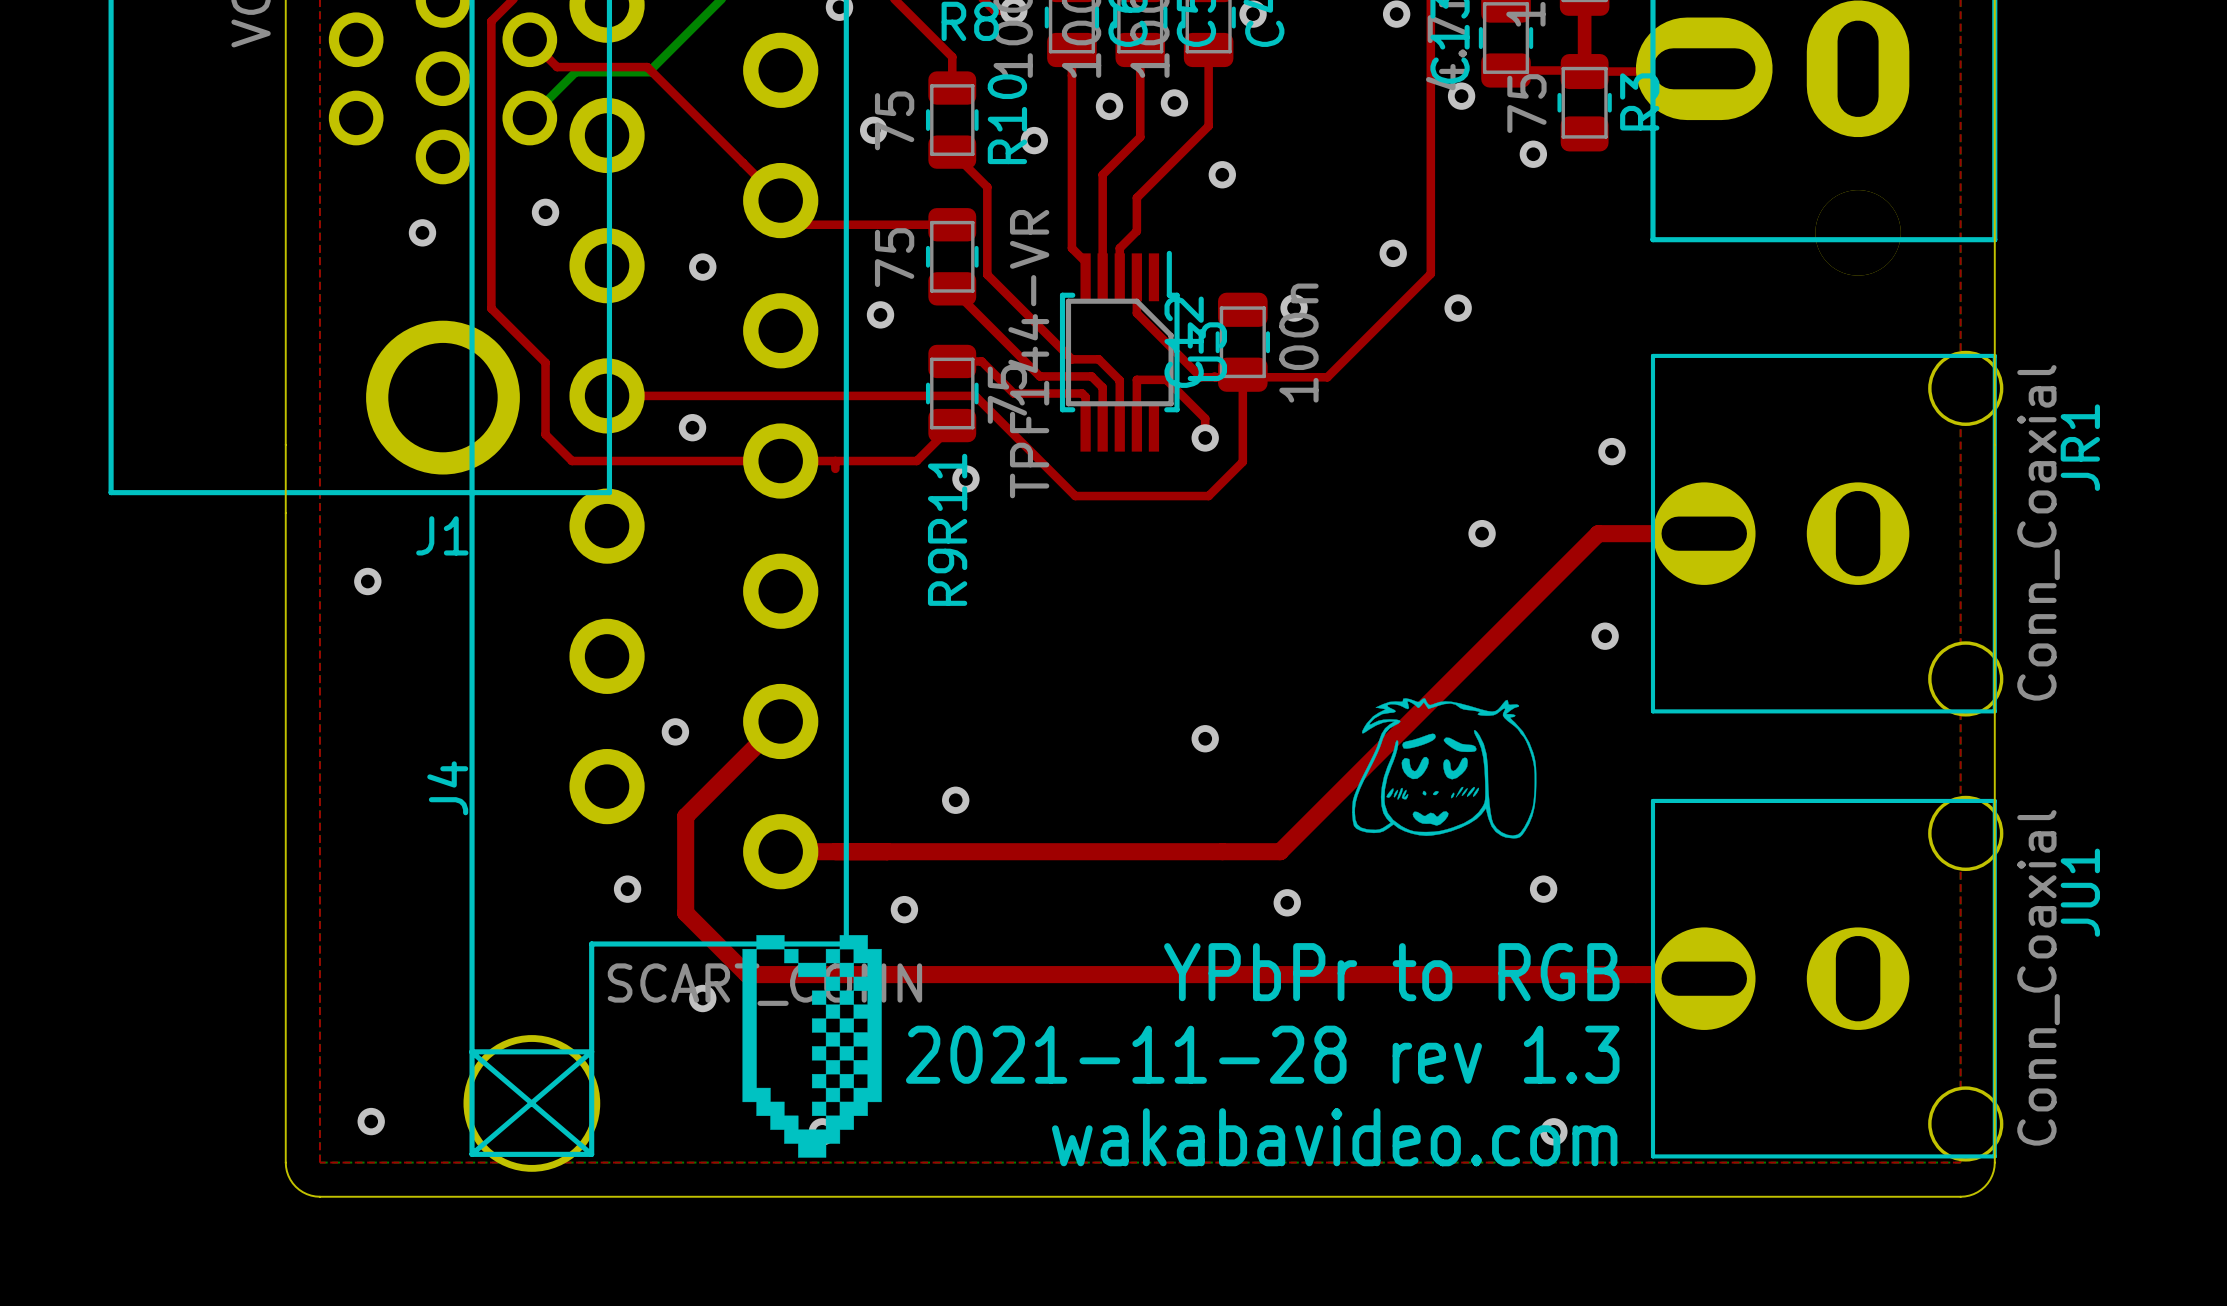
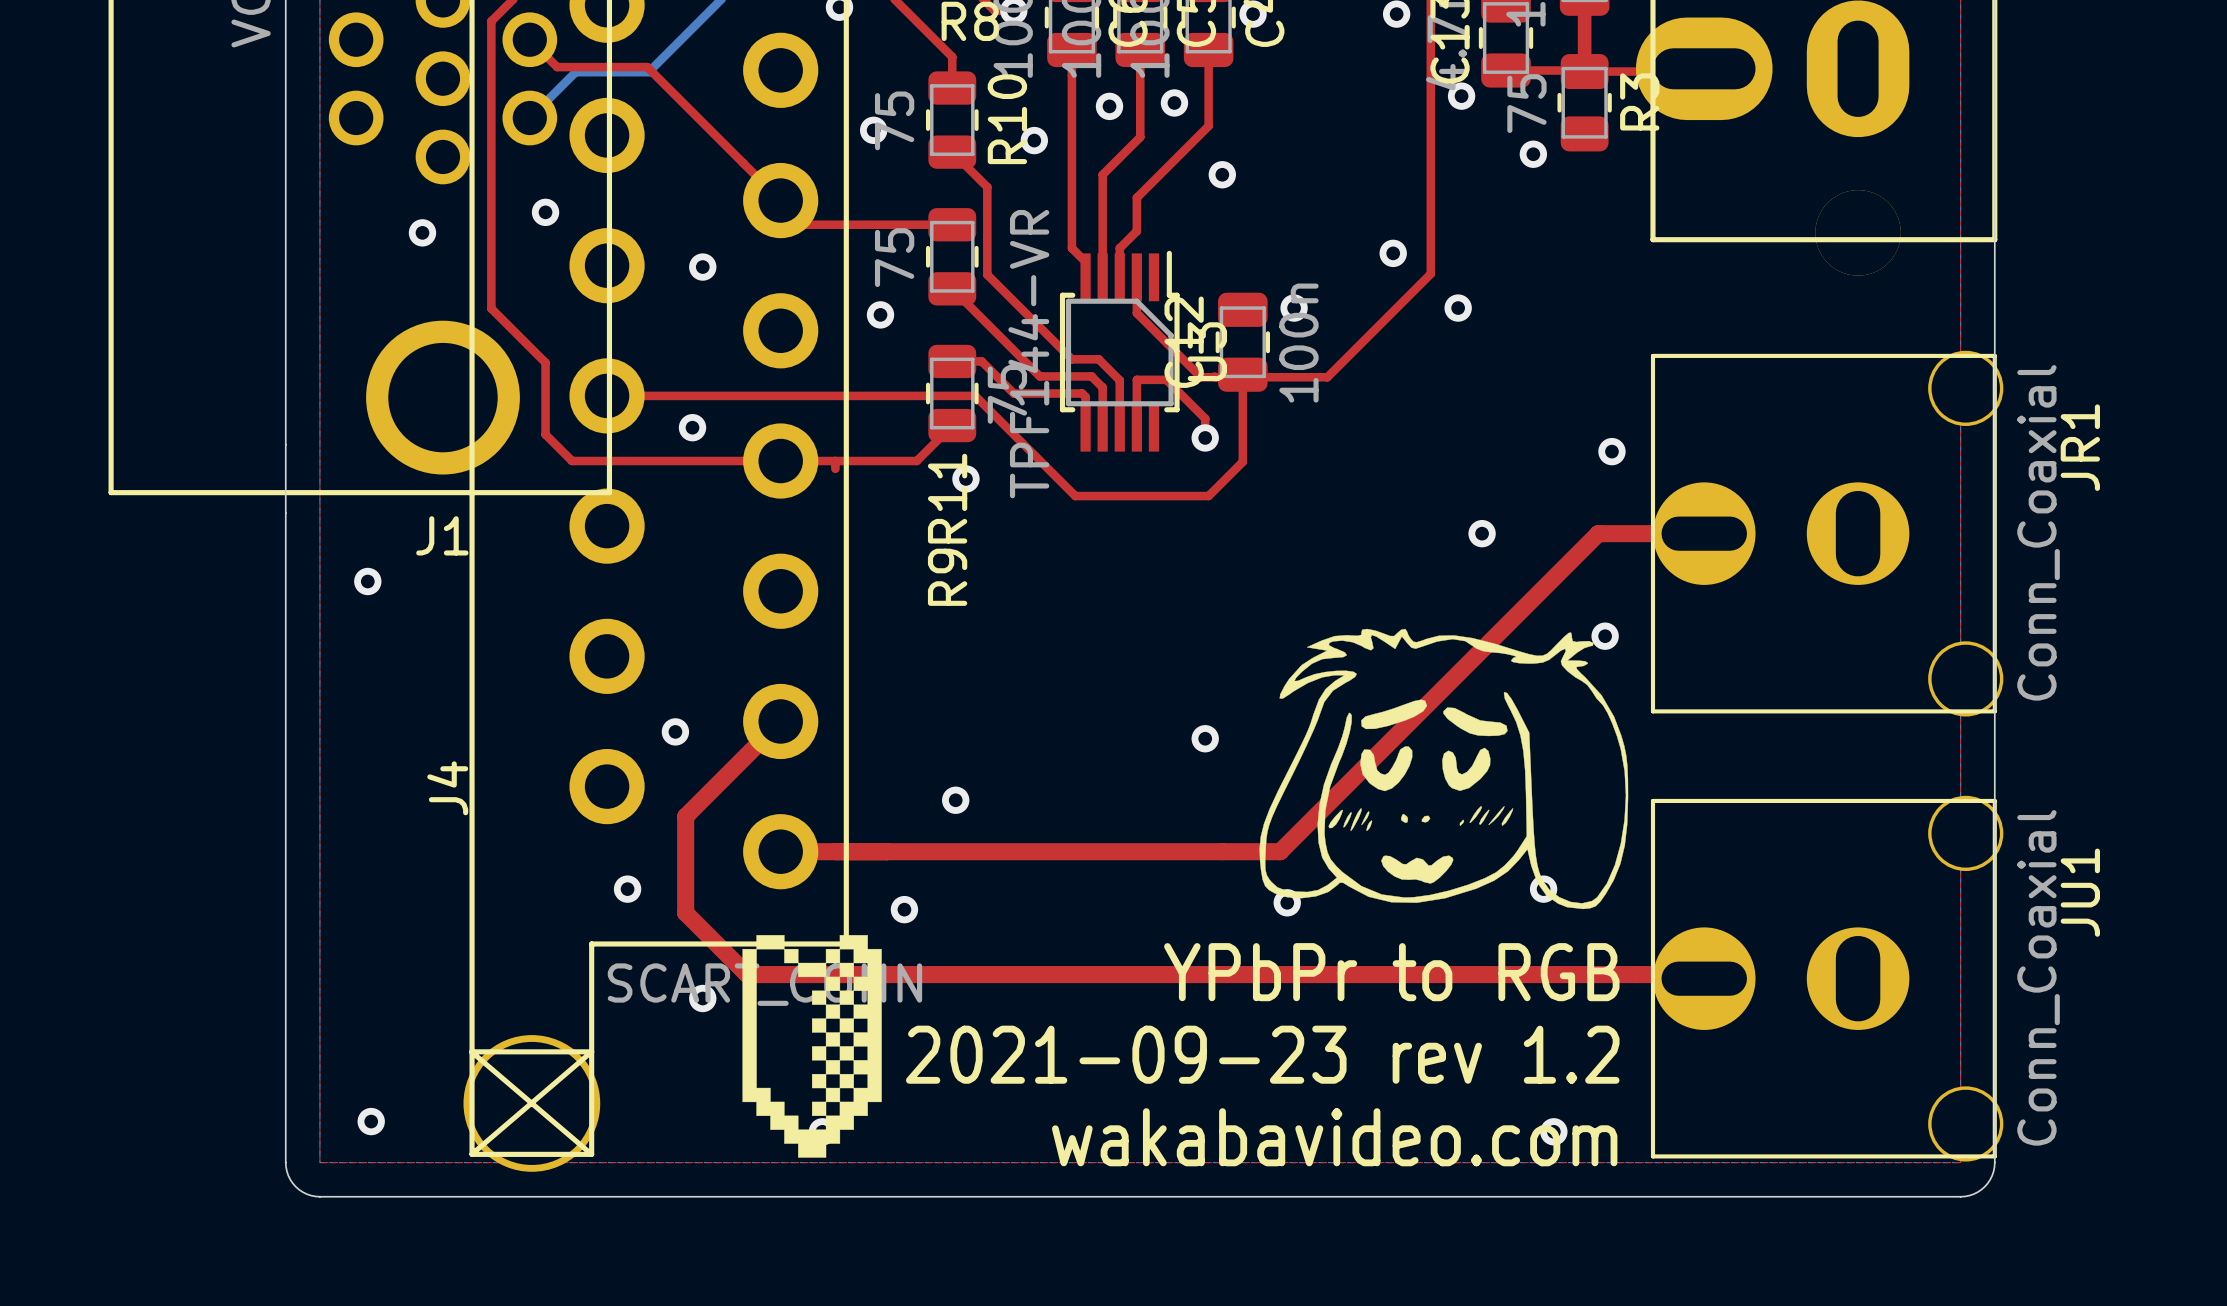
drawing shape: [1352, 698, 1537, 839] -> [1259, 628, 1629, 910]
text: 2021-11-28 rev 1.3 (1262, 1054) -> 2021-09-23 rev 1.2 (1262, 1054)

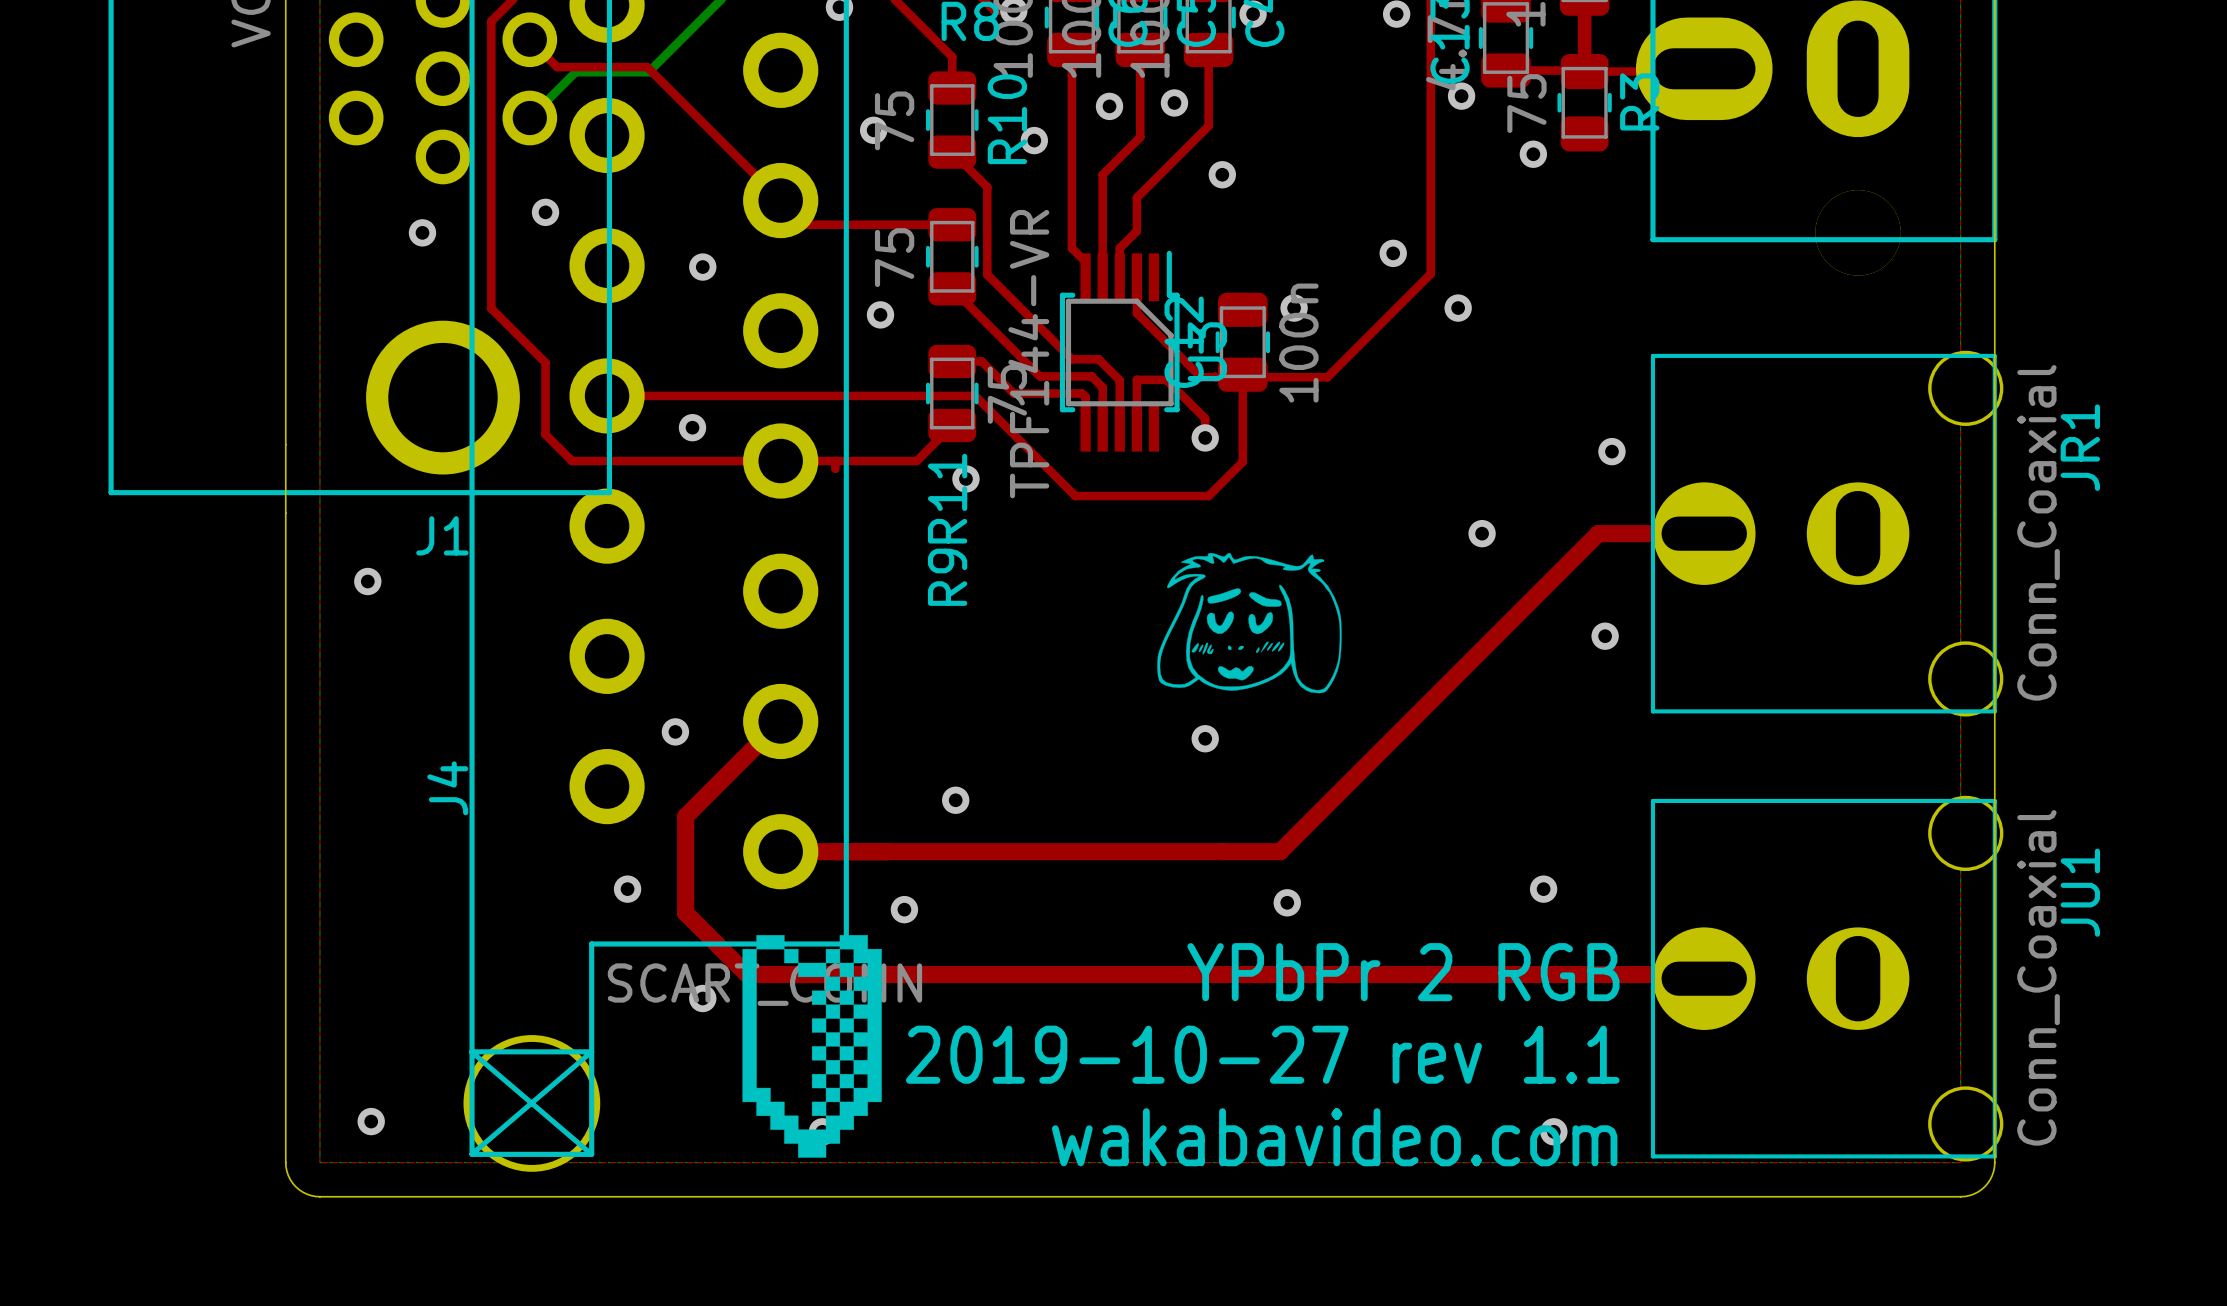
drawing: none -> [1157, 552, 1342, 694]
drawing: [1259, 628, 1629, 910] -> none
text: YPbPr to RGB (1391, 972) -> YPbPr 2 RGB (1403, 972)
text: 2021-09-23 rev 1.2 (1262, 1054) -> 2019-10-27 rev 1.1 (1262, 1054)

